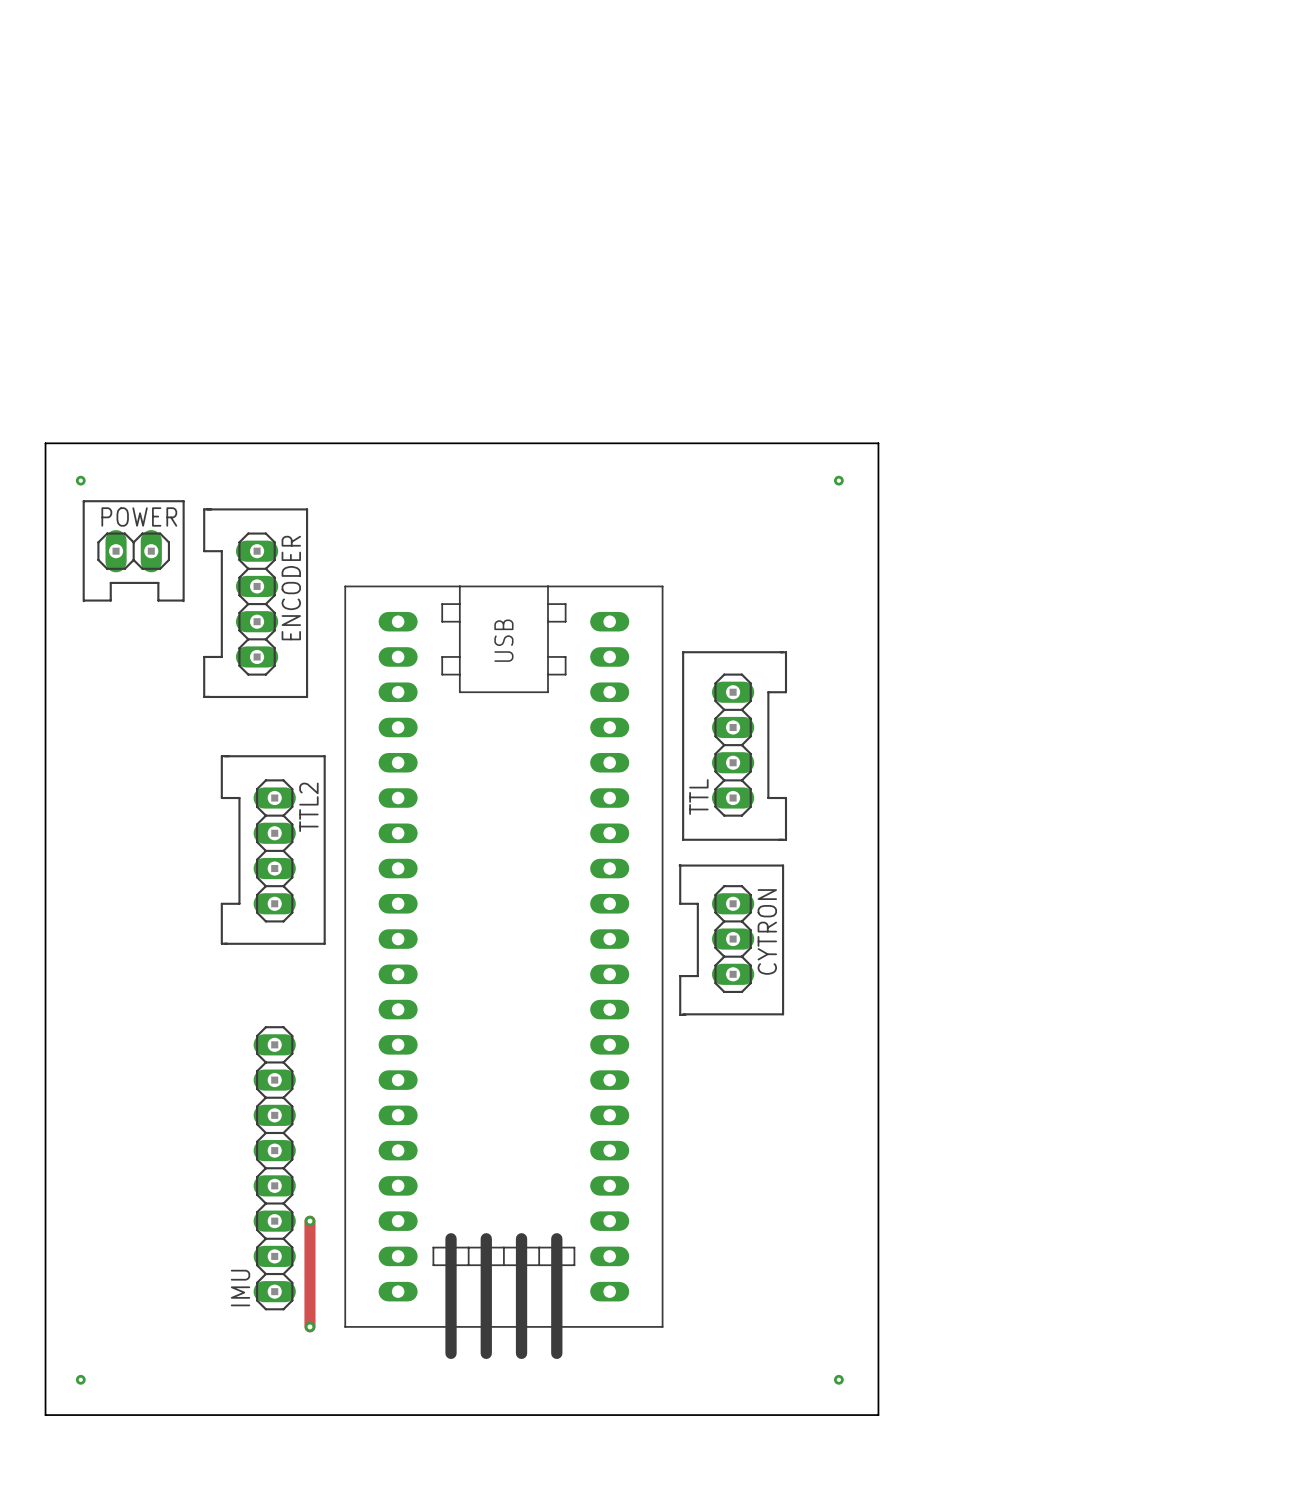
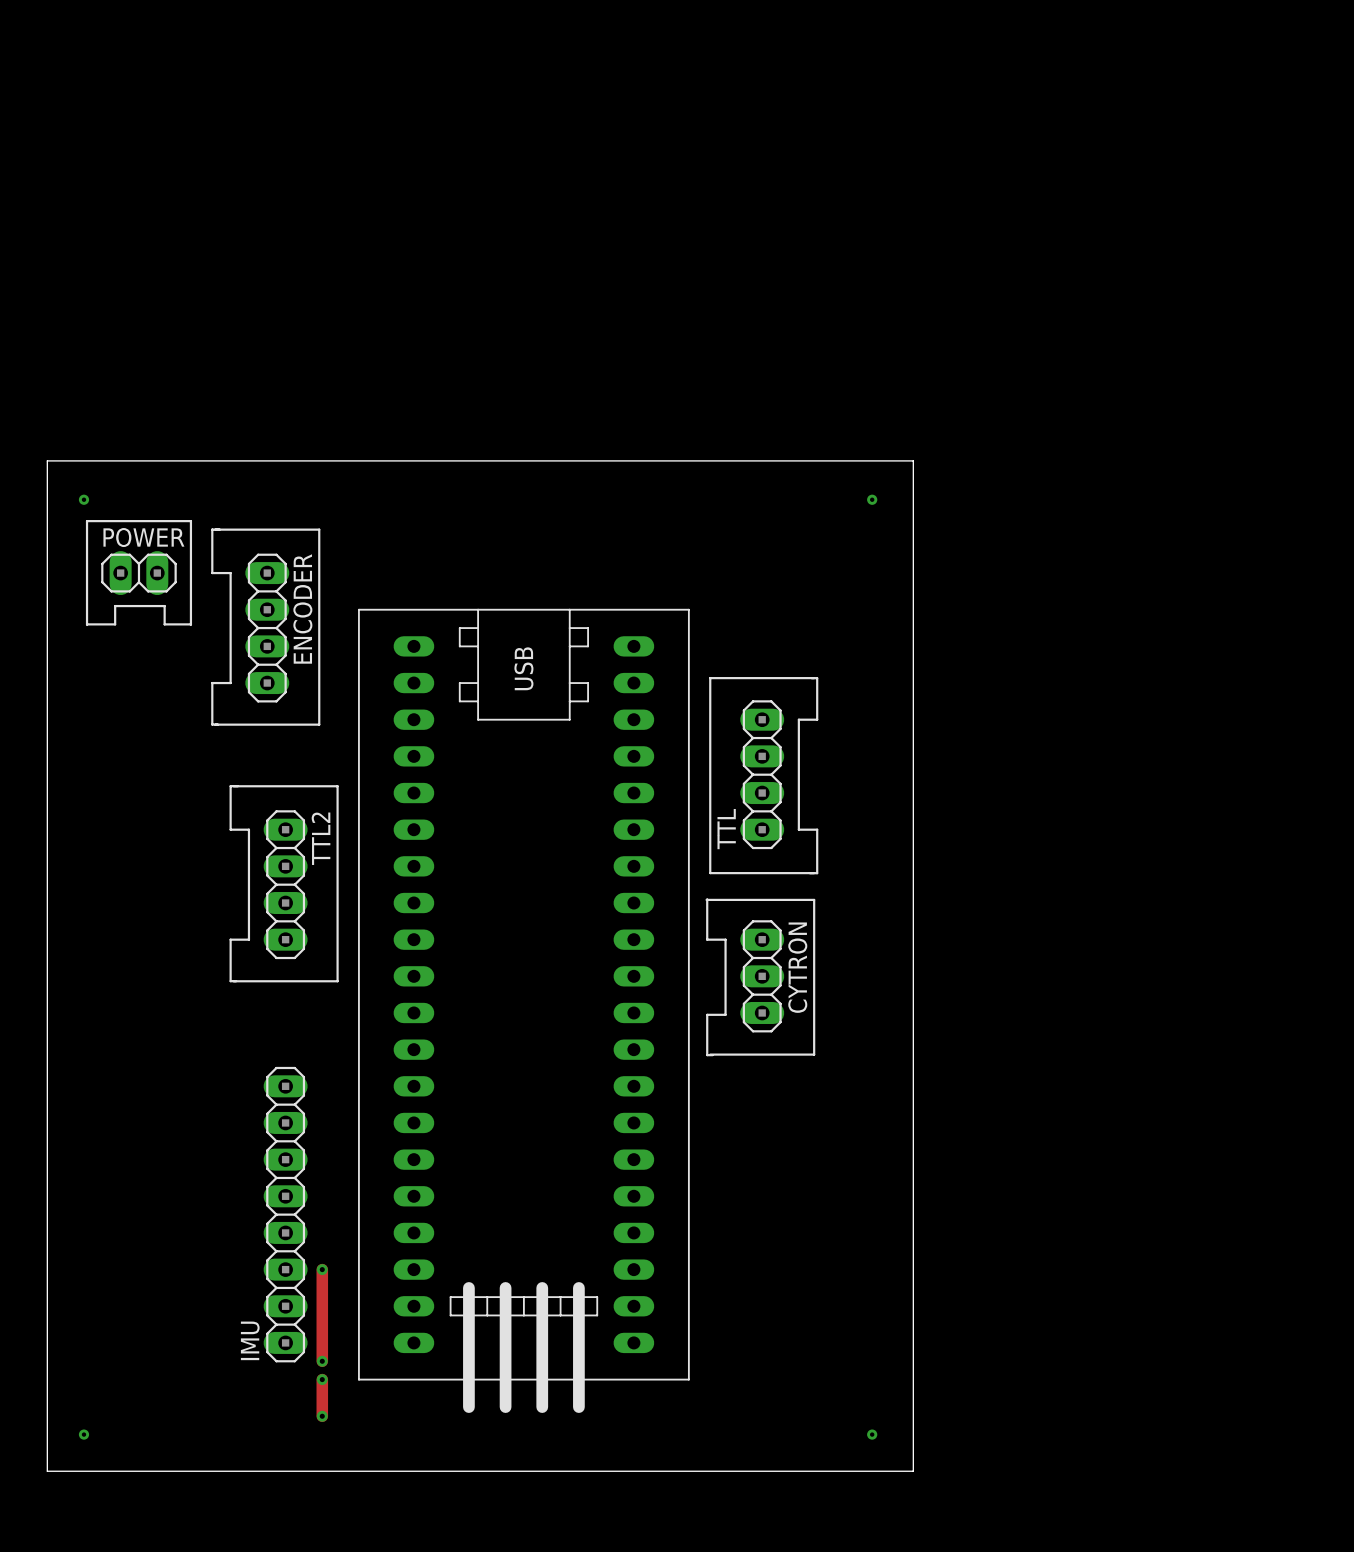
track: (309, 1309) (309, 1326) -> (322, 1416) (322, 1379)
via: none -> (322, 1361)
via: none -> (322, 1416)

